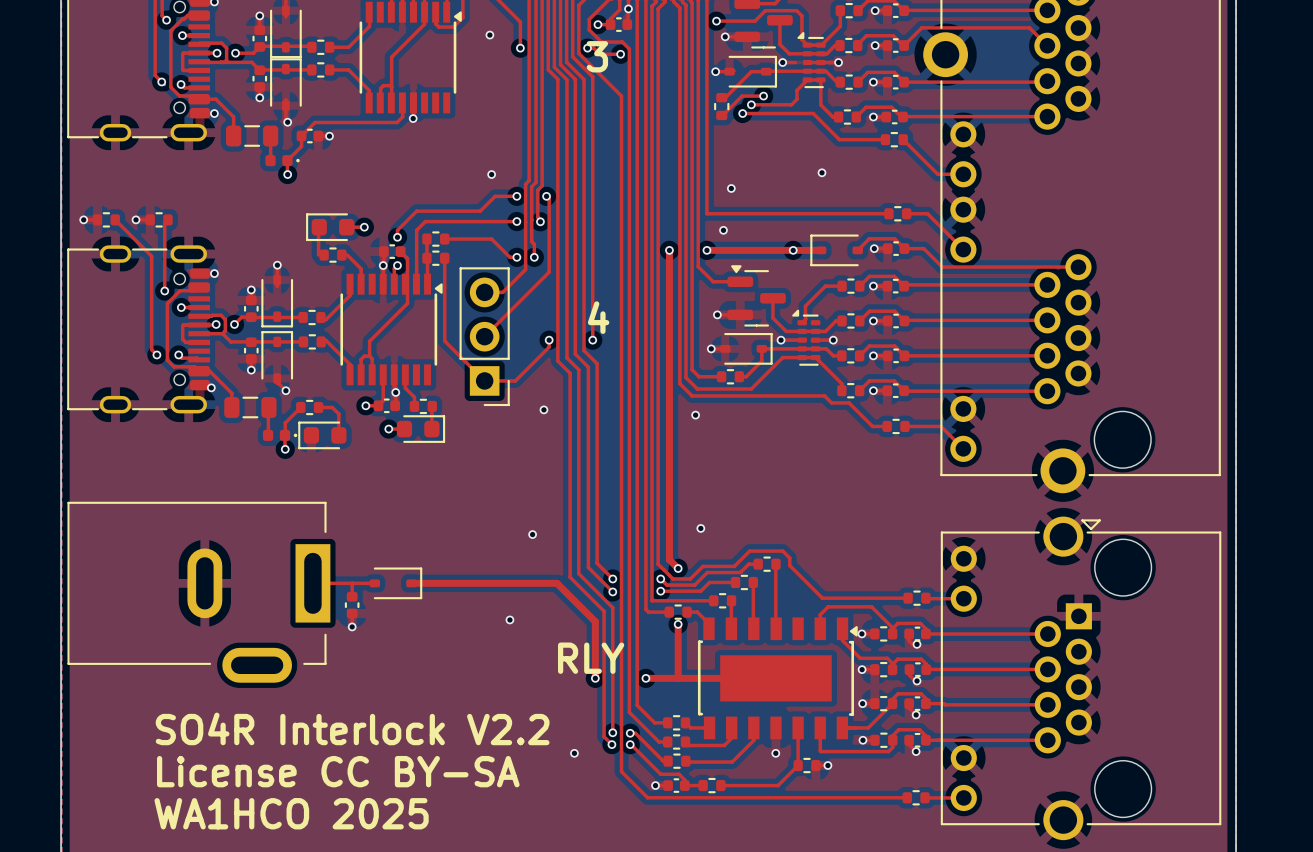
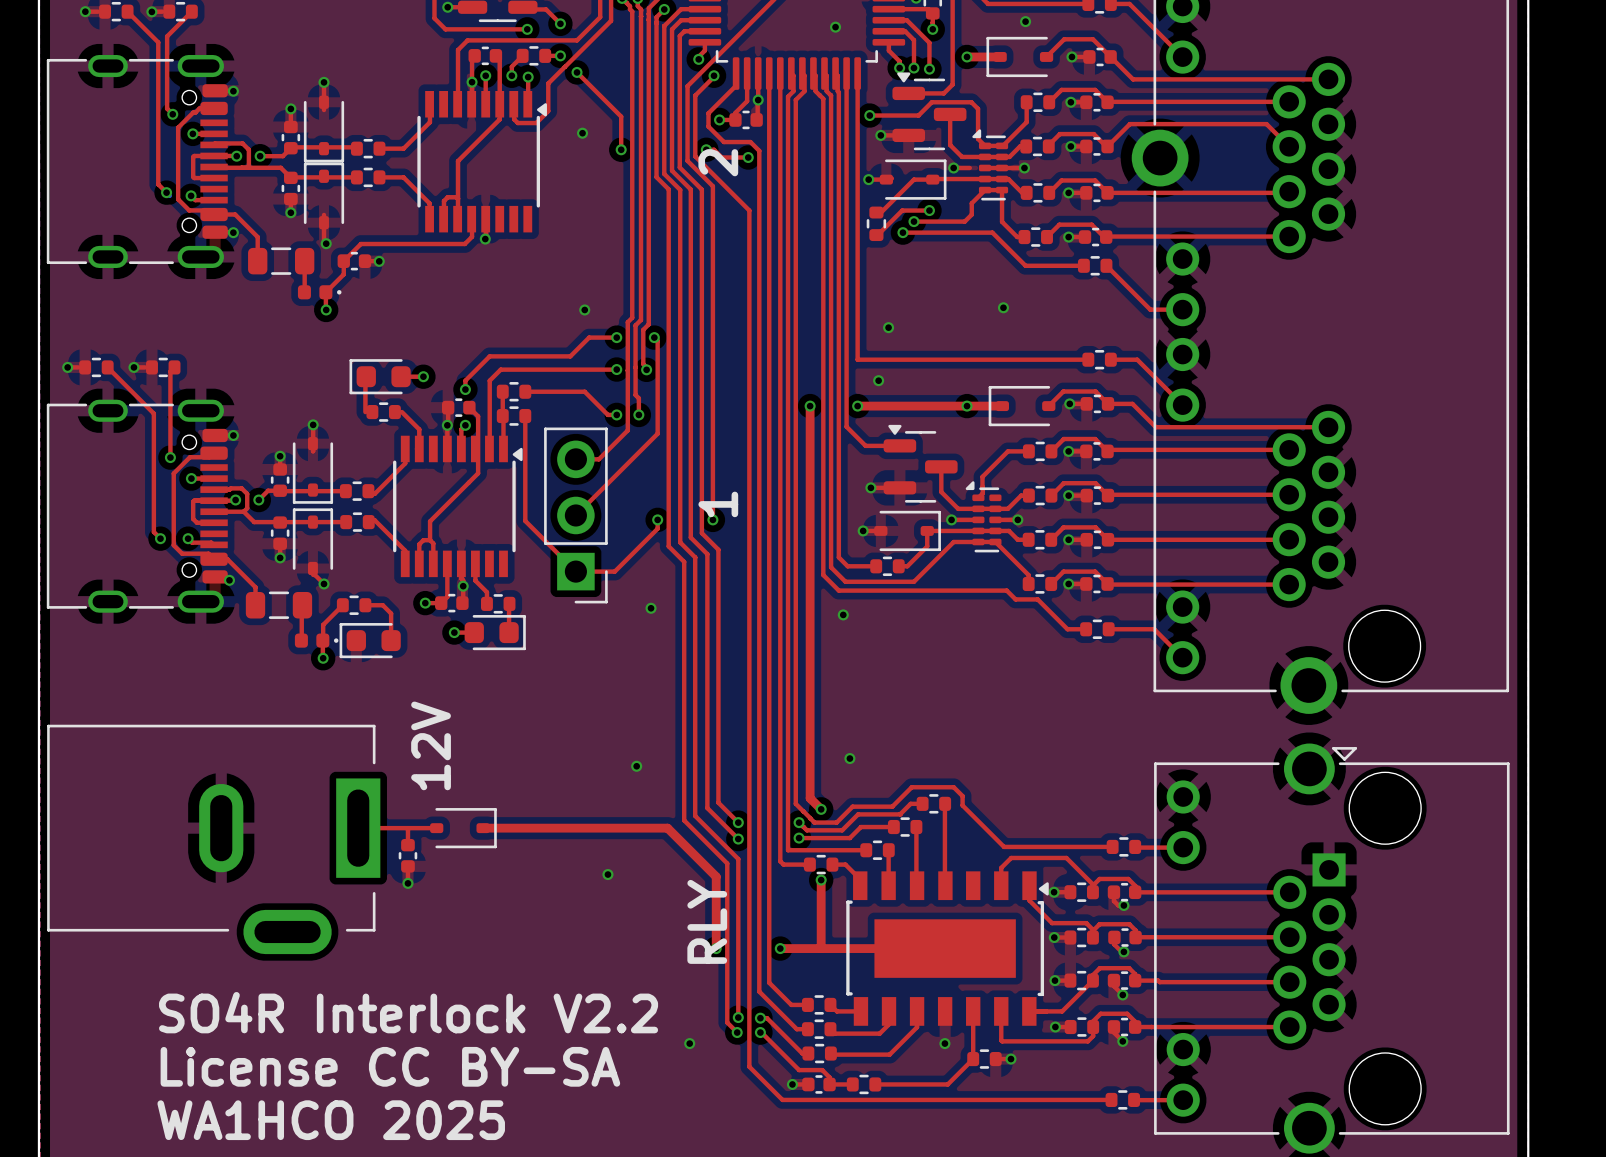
text: 3 (597, 56) -> 2 (718, 162)
text: 4 (598, 317) -> 1 (718, 504)
text: none -> 12V (431, 745)
text rotation: 0° (591, 658) -> 90° counterclockwise (707, 921)

